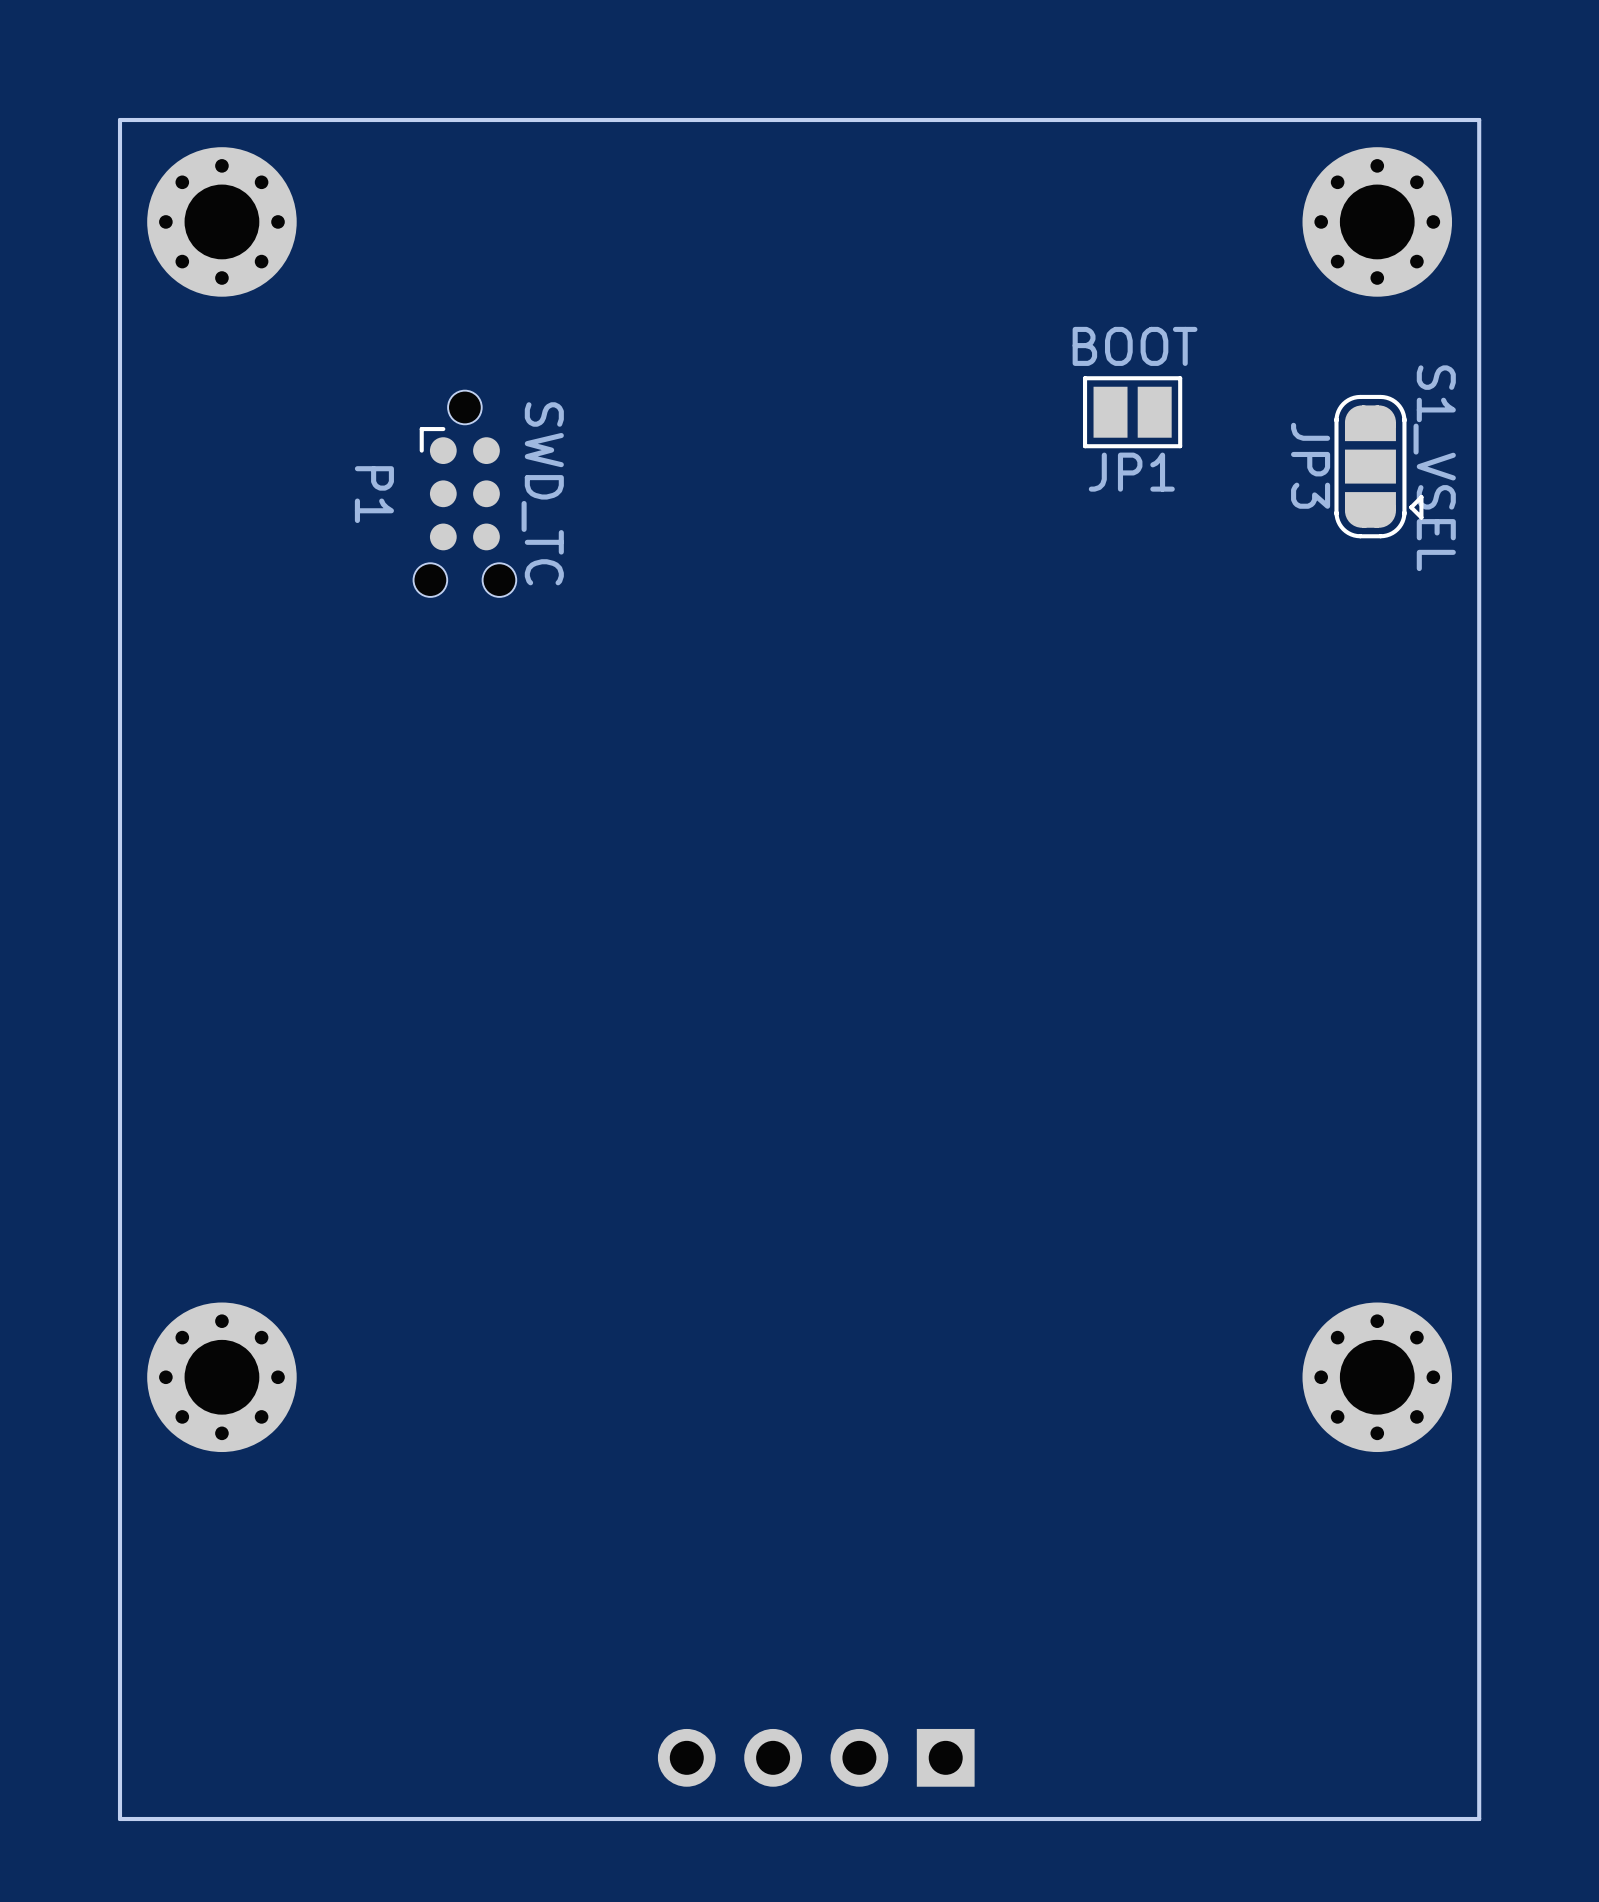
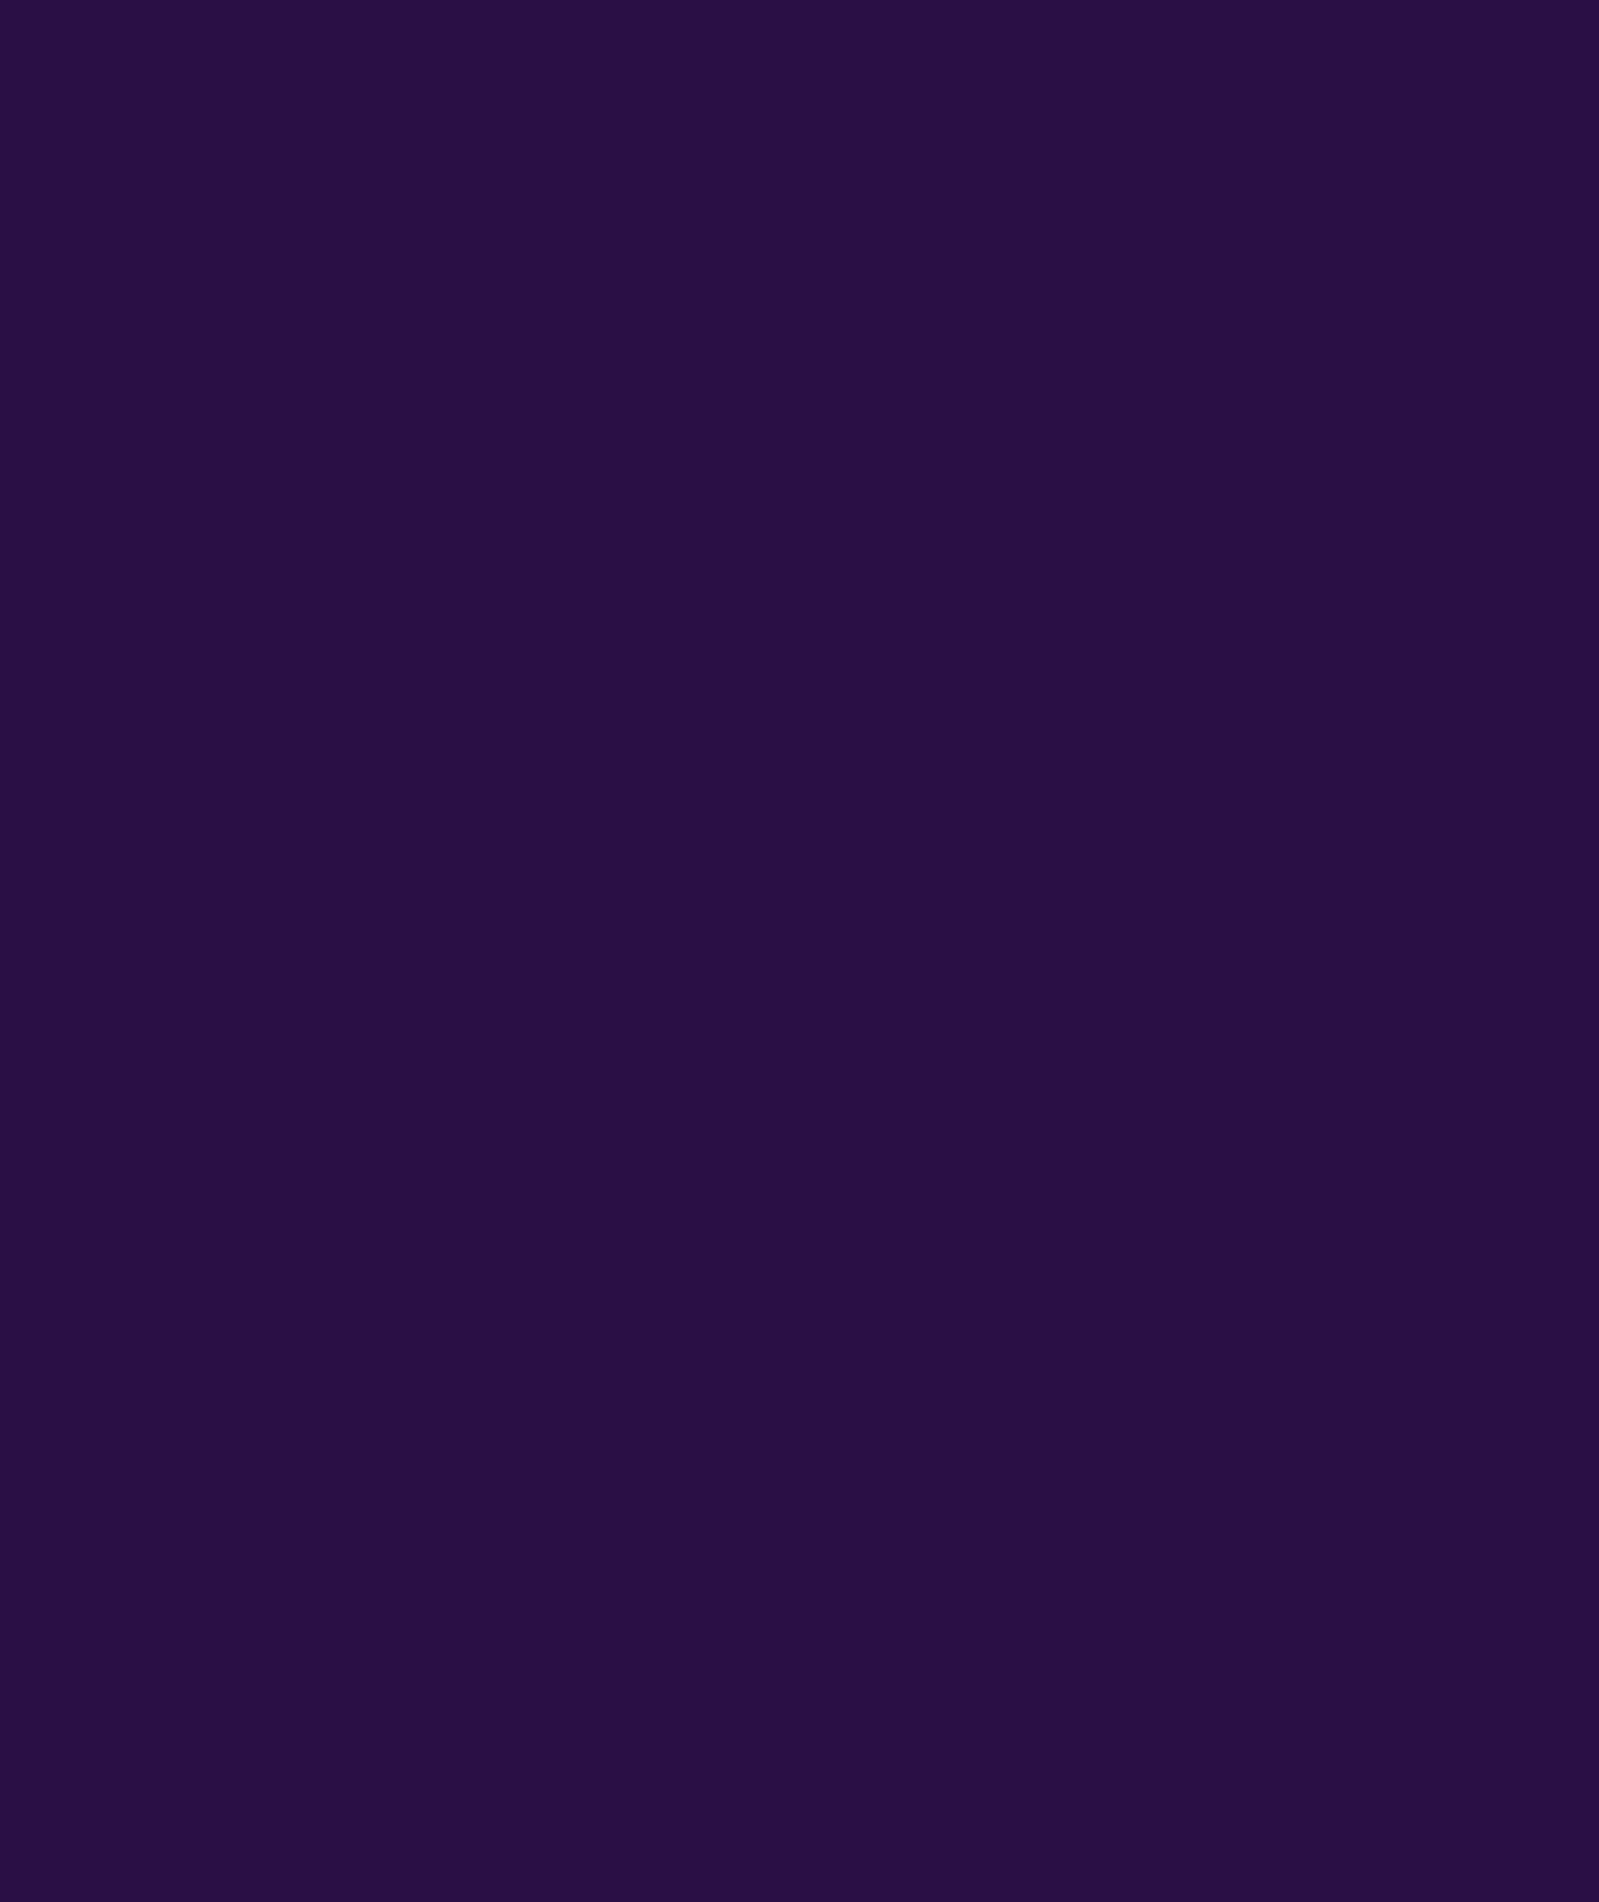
board edge: (1479, 120) (120, 120) (120, 1819) (1479, 1819) (1479, 120) -> none
part: (221, 221) -> none
part: (1377, 221) -> none
JP1: BOOT (1132, 412) -> none
JP3: S1_VSEL (1378, 466) -> none
P1: SWD_TC (464, 493) -> none
part: (221, 1377) -> none
part: (1377, 1377) -> none
part: (816, 1757) -> none

